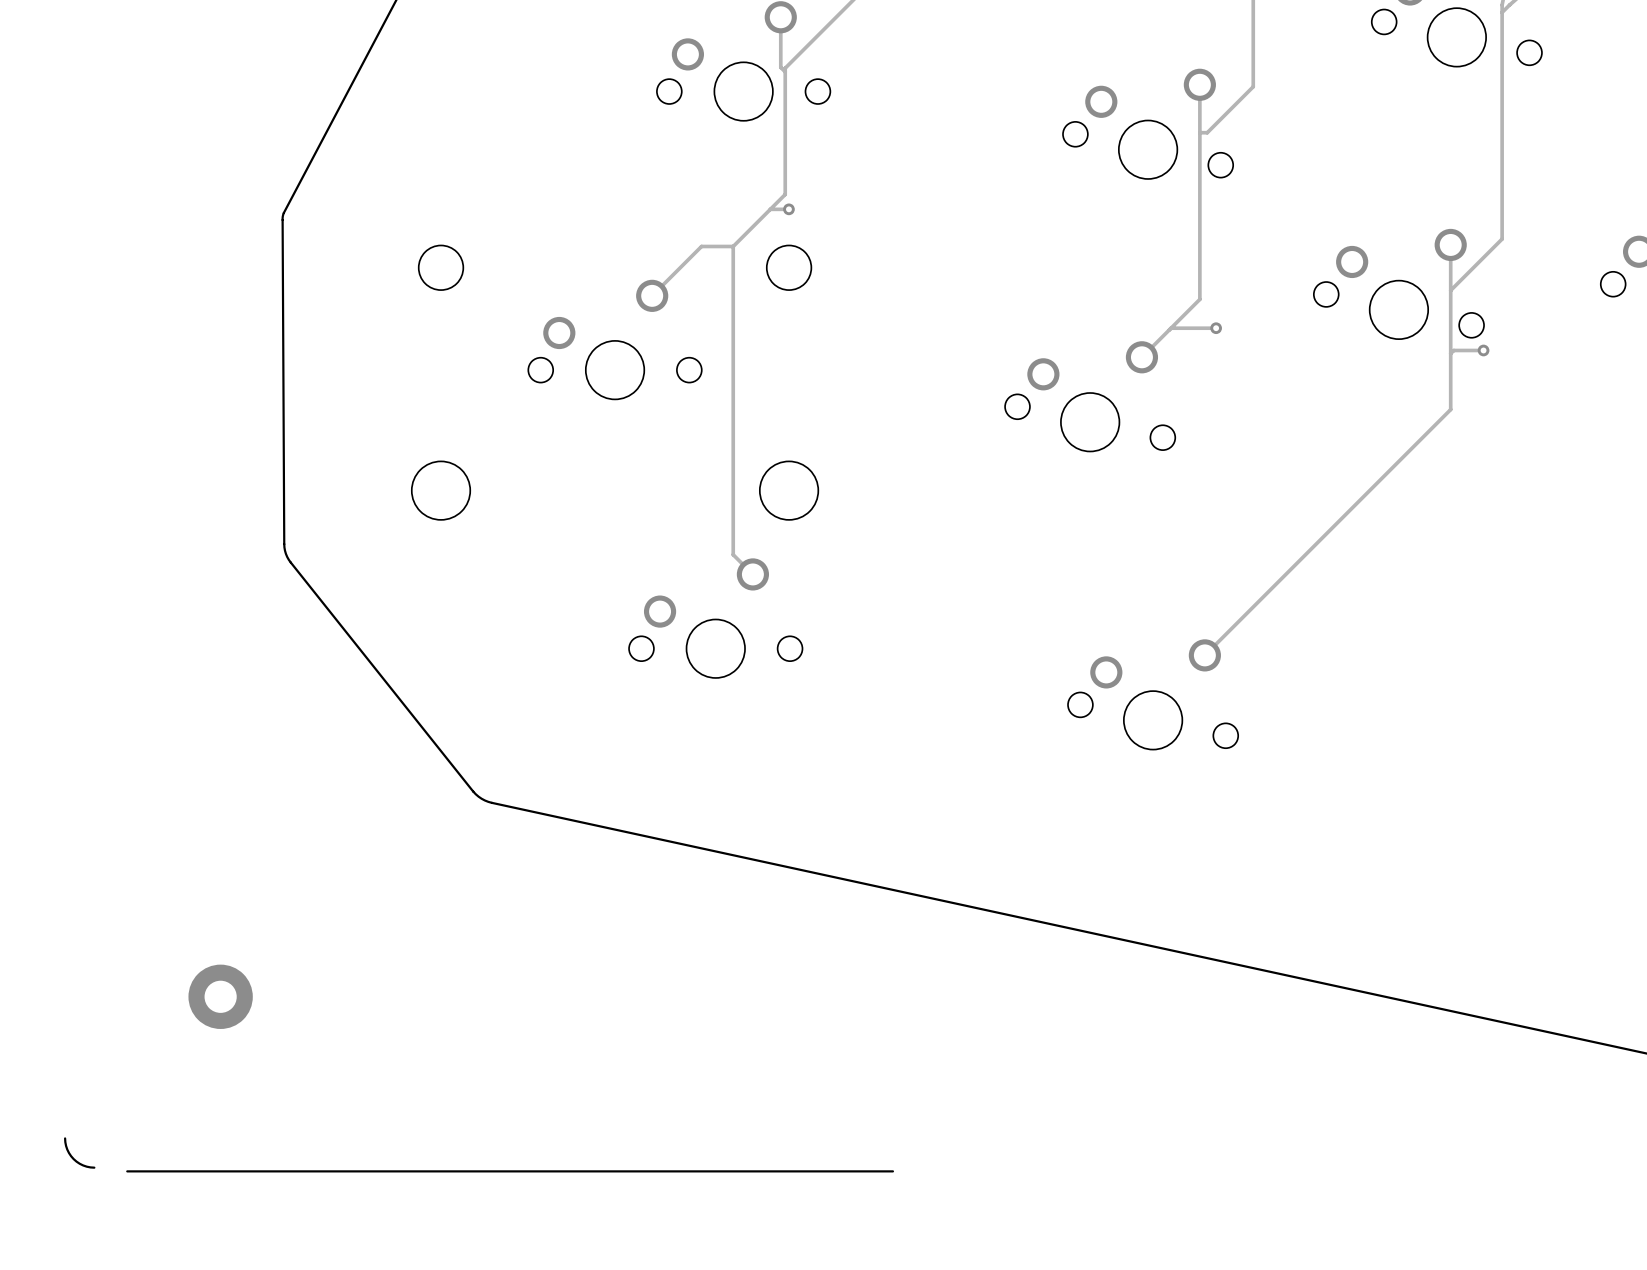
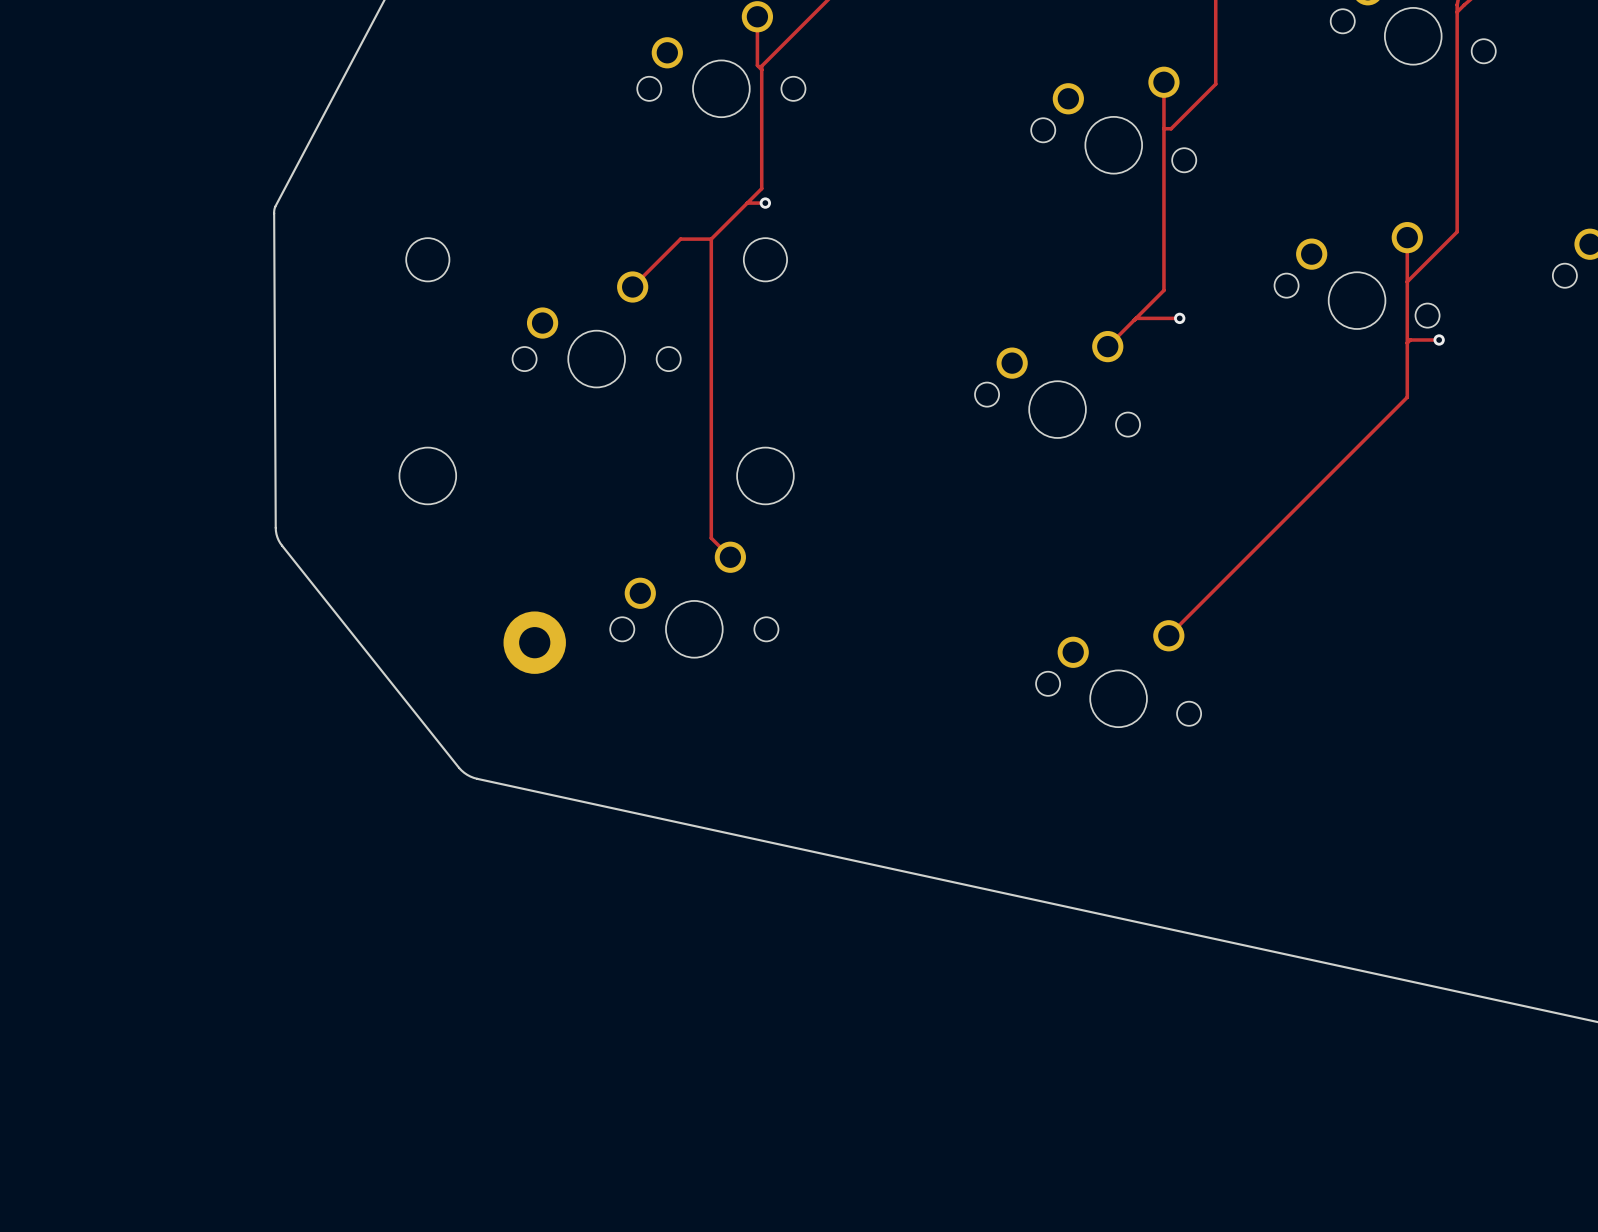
part: none -> (534, 642)
part: (220, 996) -> none
board edge: (65, 1138) (67, 1149) (73, 1159) (83, 1165) (94, 1167) -> none
board edge: (127, 1171) (892, 1171) -> none

